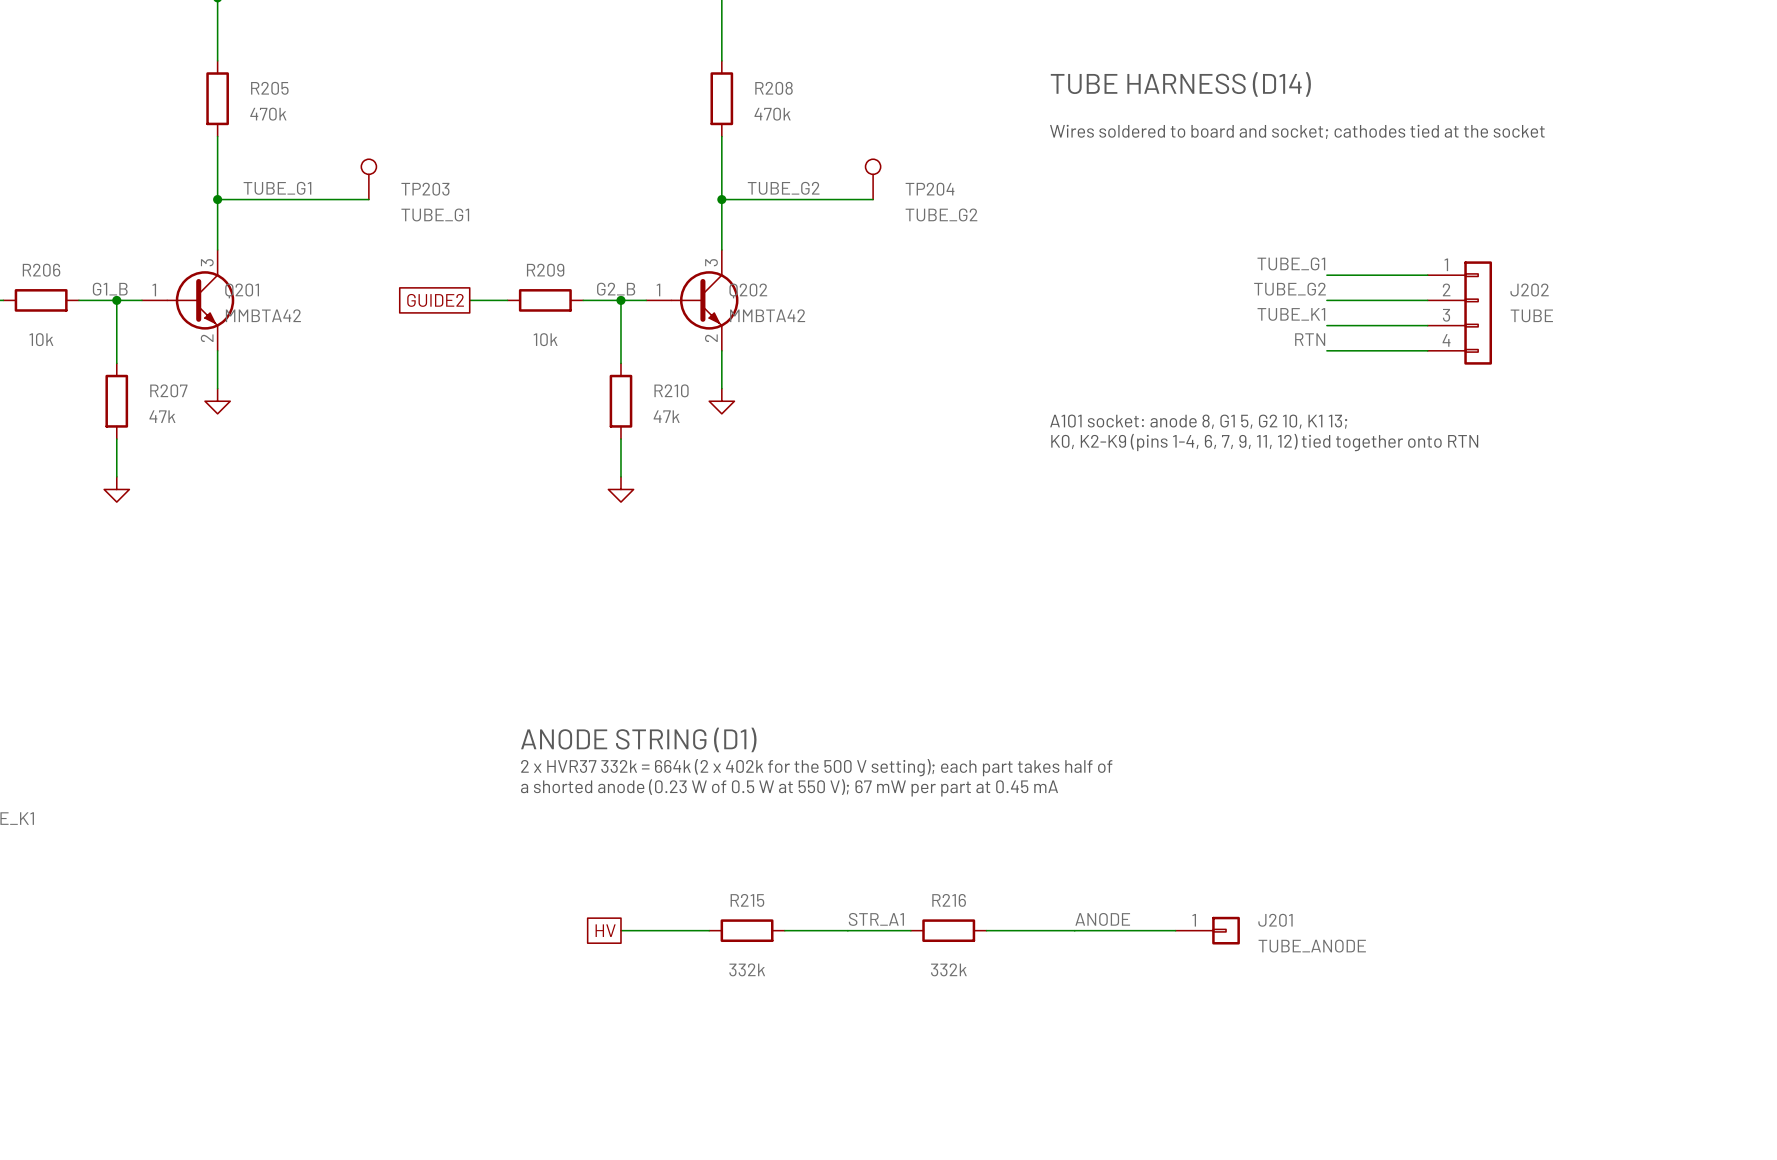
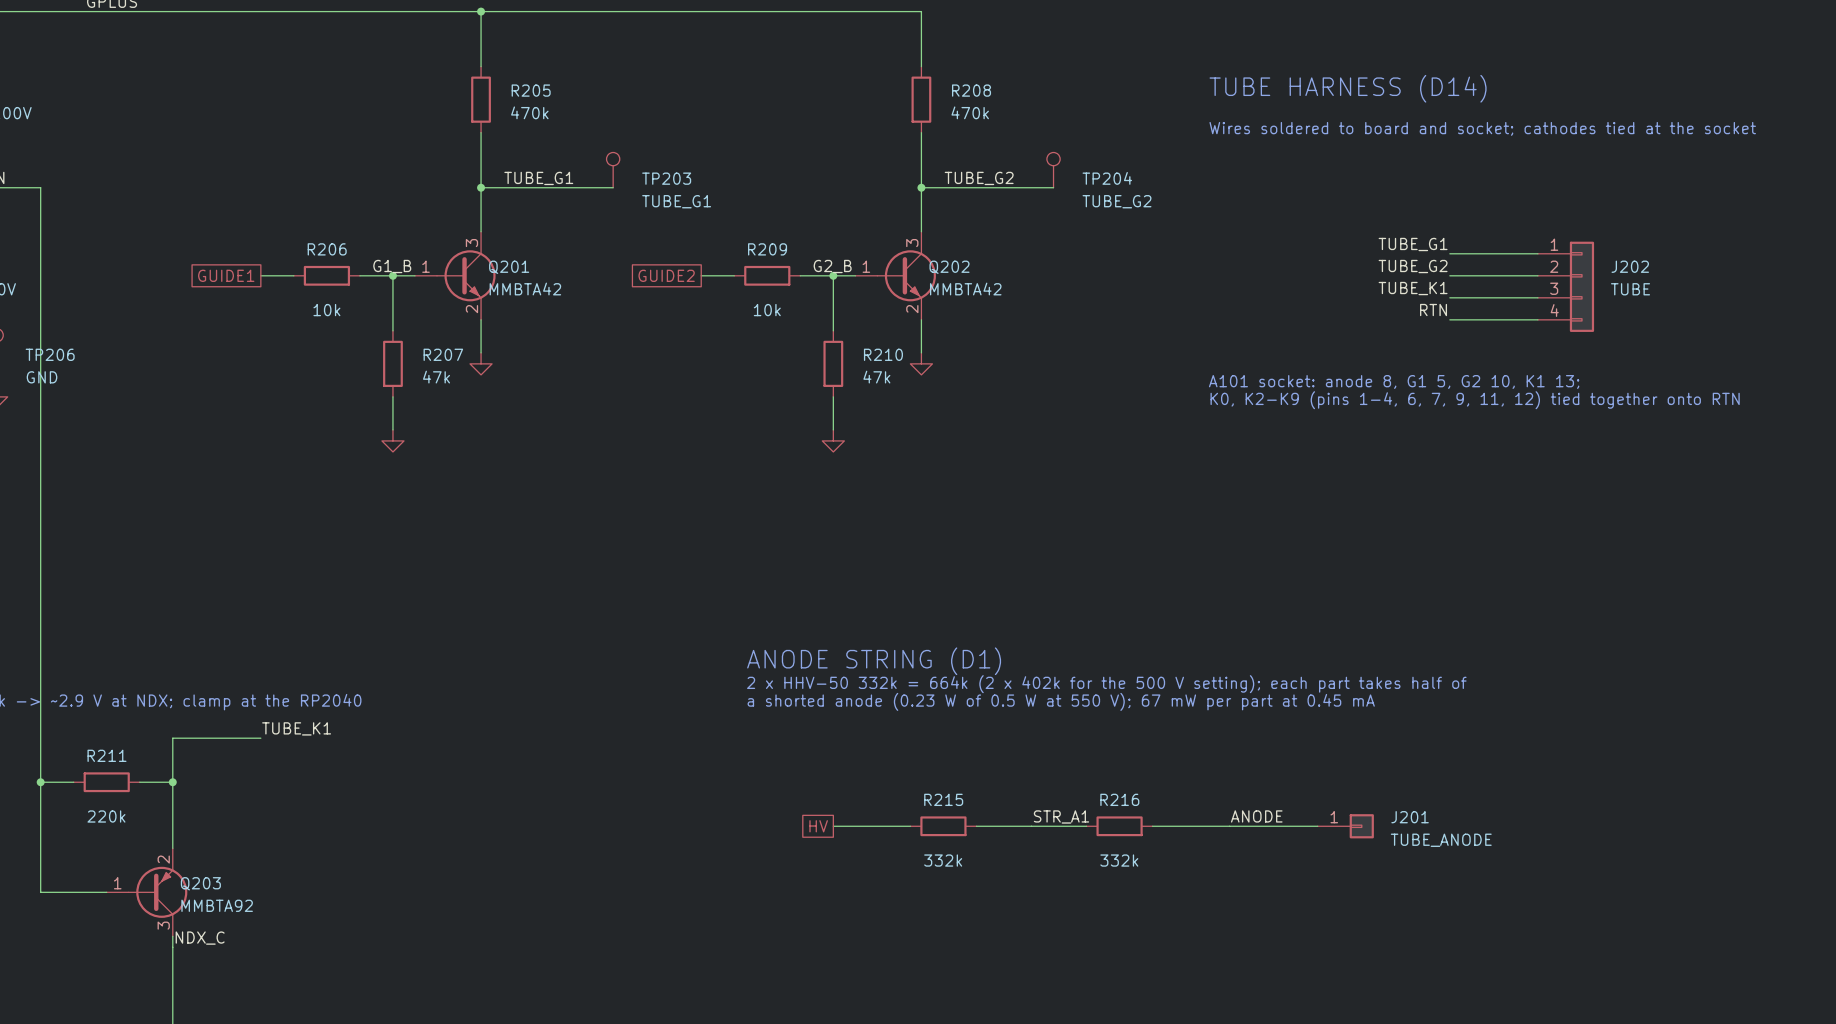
text: 2 x HVR37 332k = 664k (2 x 402k for the 500 V setting); each part takes half of (816, 767) -> 2 x HHV-50 332k = 664k (2 x 402k for the 500 V setting); each part takes half of (1106, 684)

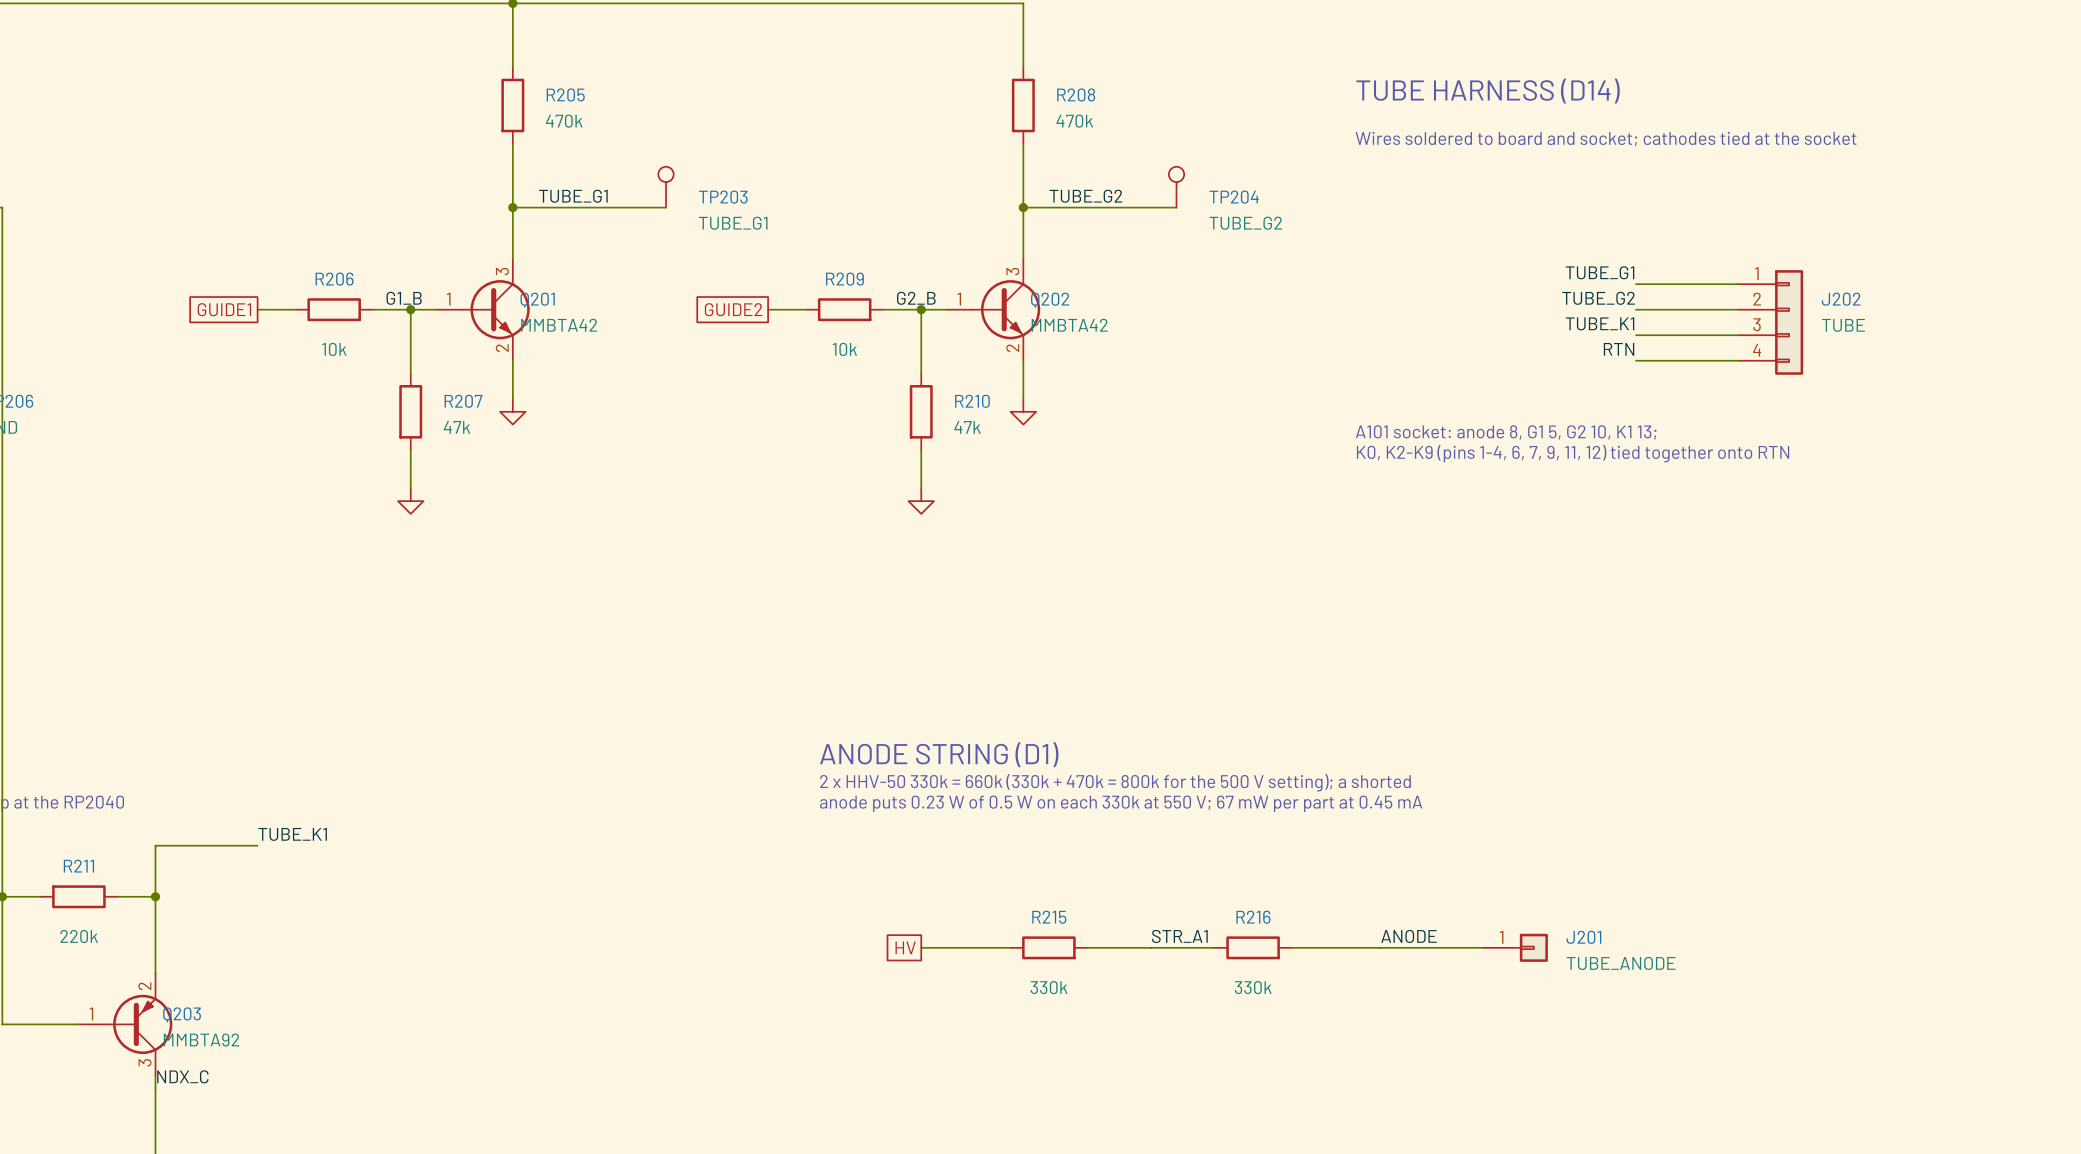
text: 2 x HHV-50 332k = 664k (2 x 402k for the 500 V setting); each part takes half of (1106, 684) -> 2 x HHV-50 330k = 660k (330k + 470k = 800k for the 500 V setting); a shorted (1115, 782)
text: a shorted anode (0.23 W of 0.5 W at 550 V); 67 mW per part at 0.45 mA (1061, 701) -> anode puts 0.23 W of 0.5 W on each 330k at 550 V; 67 mW per part at 0.45 mA (1121, 803)
R215 value: 332k (943, 860) -> 330k (1049, 987)
R216 value: 332k (1119, 860) -> 330k (1253, 987)

